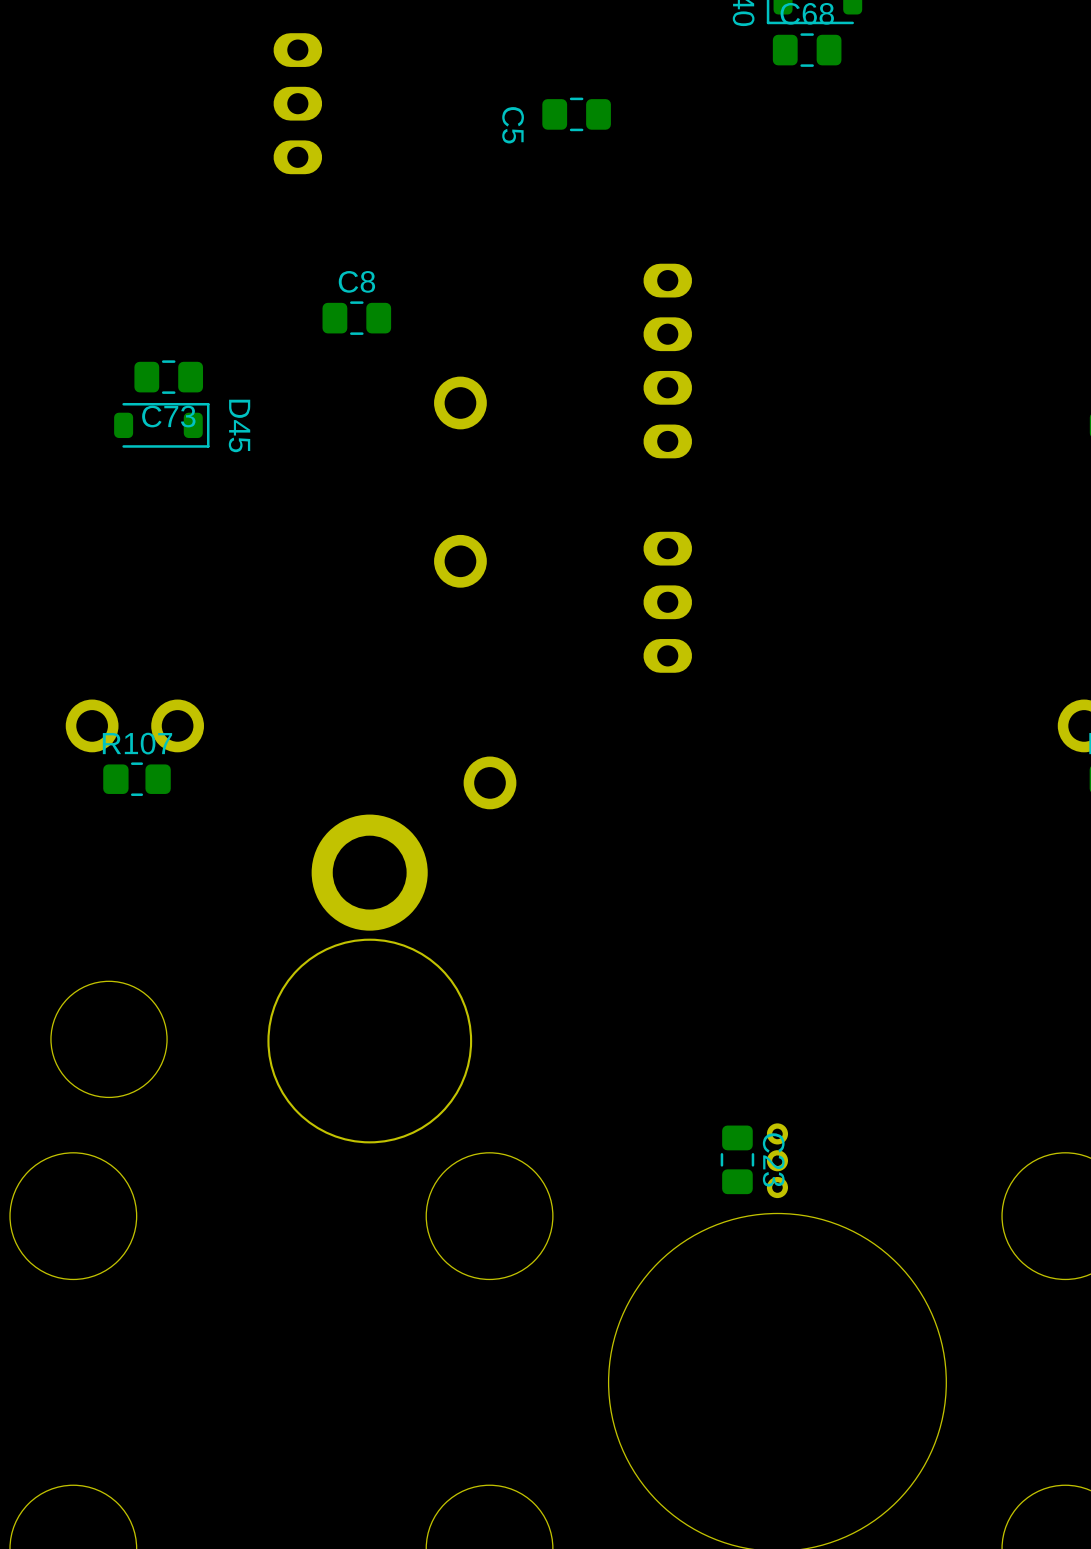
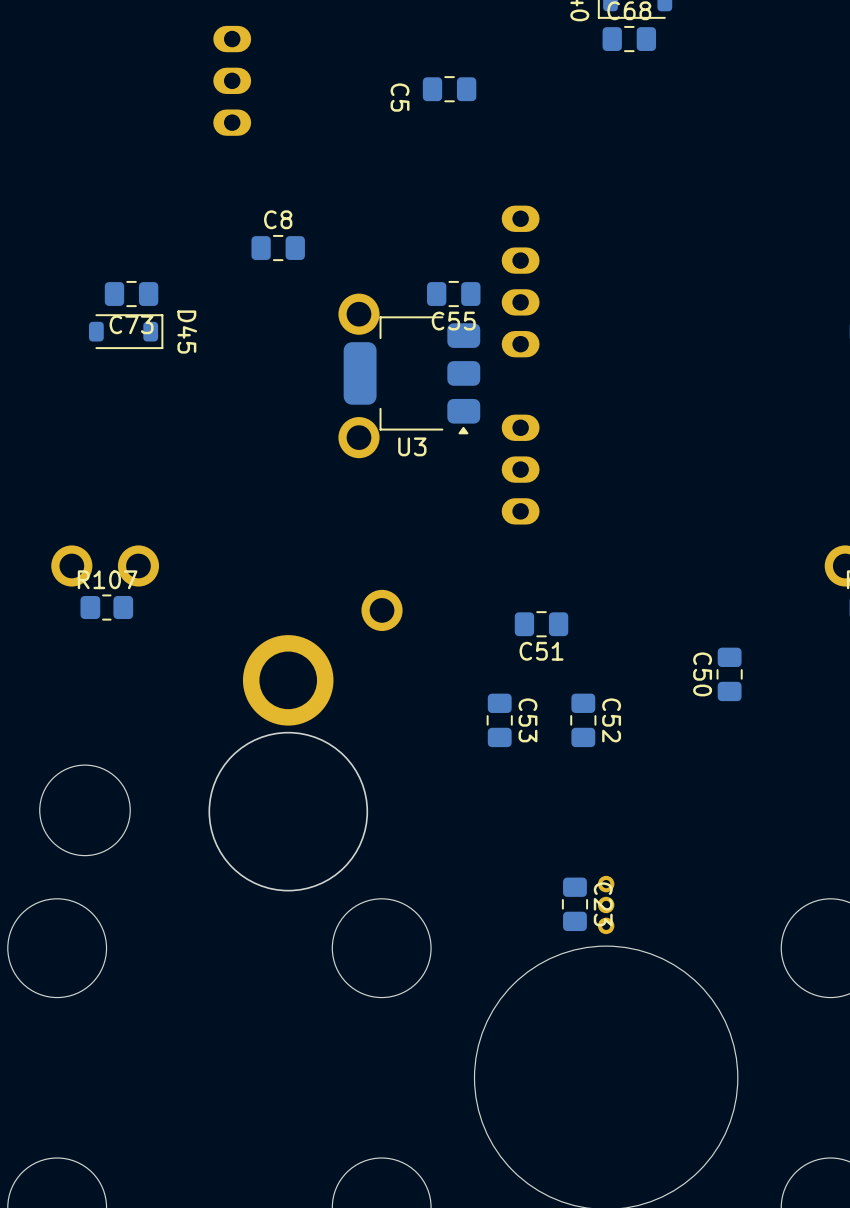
C55: none -> (453, 294)
U3: none -> (411, 375)
C51: none -> (541, 624)
C50: none -> (729, 674)
C53: none -> (499, 720)
C52: none -> (583, 720)

